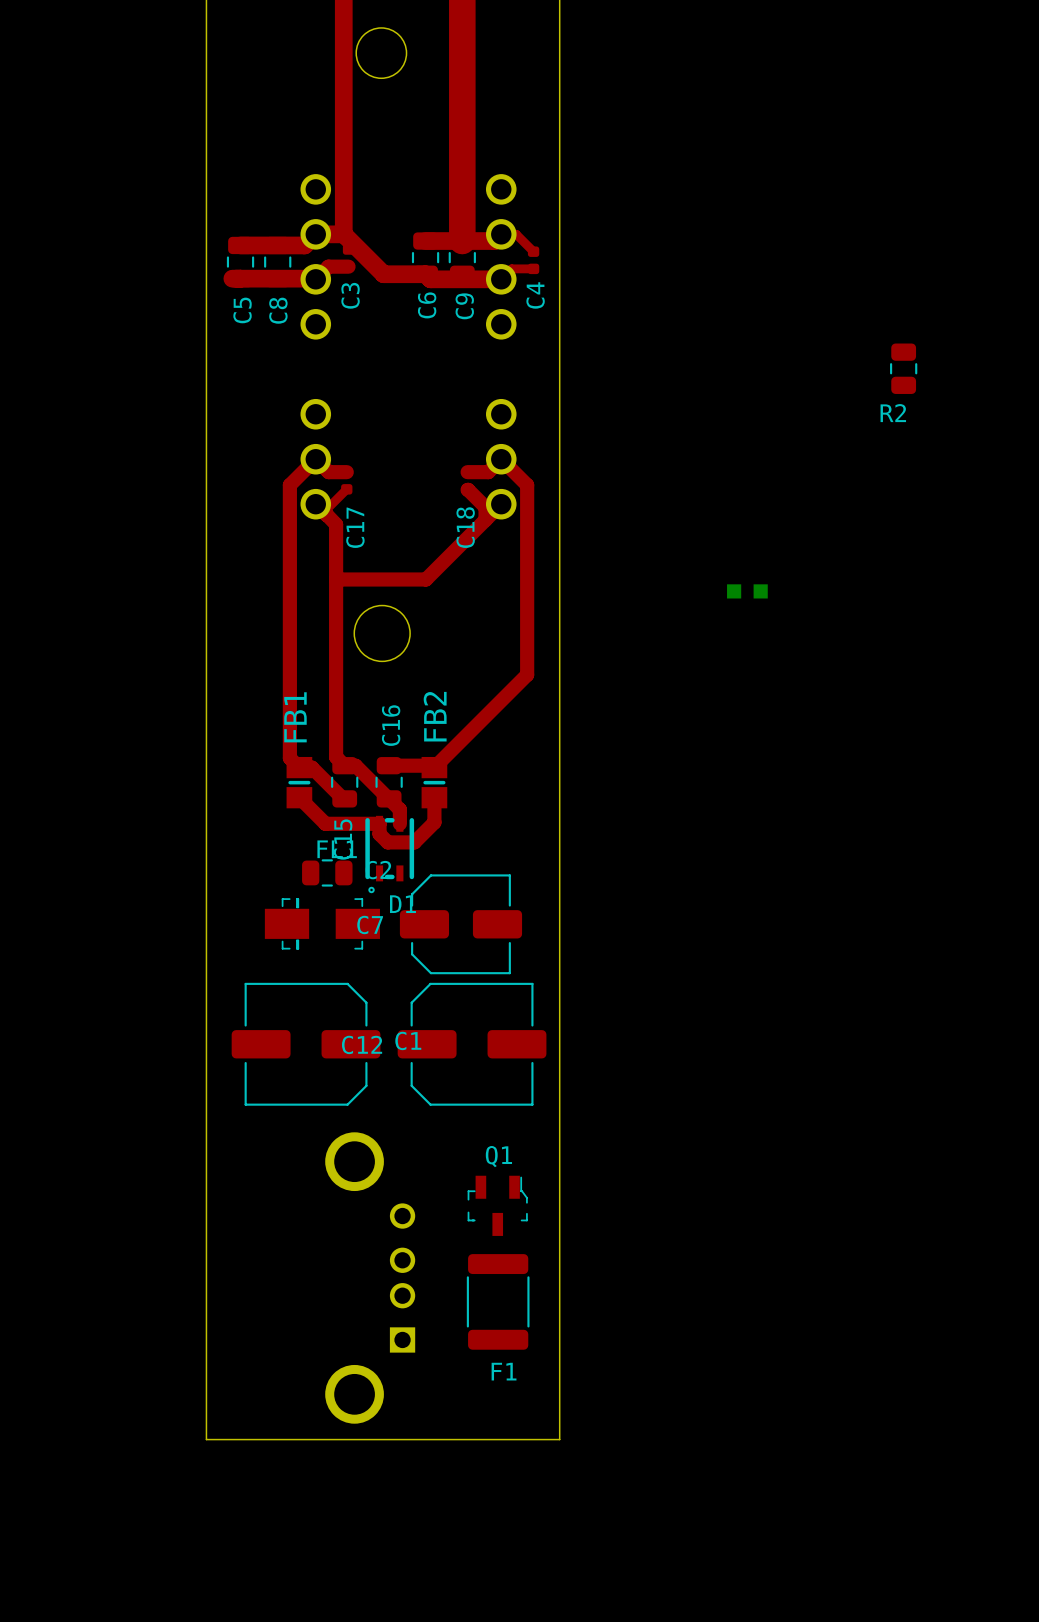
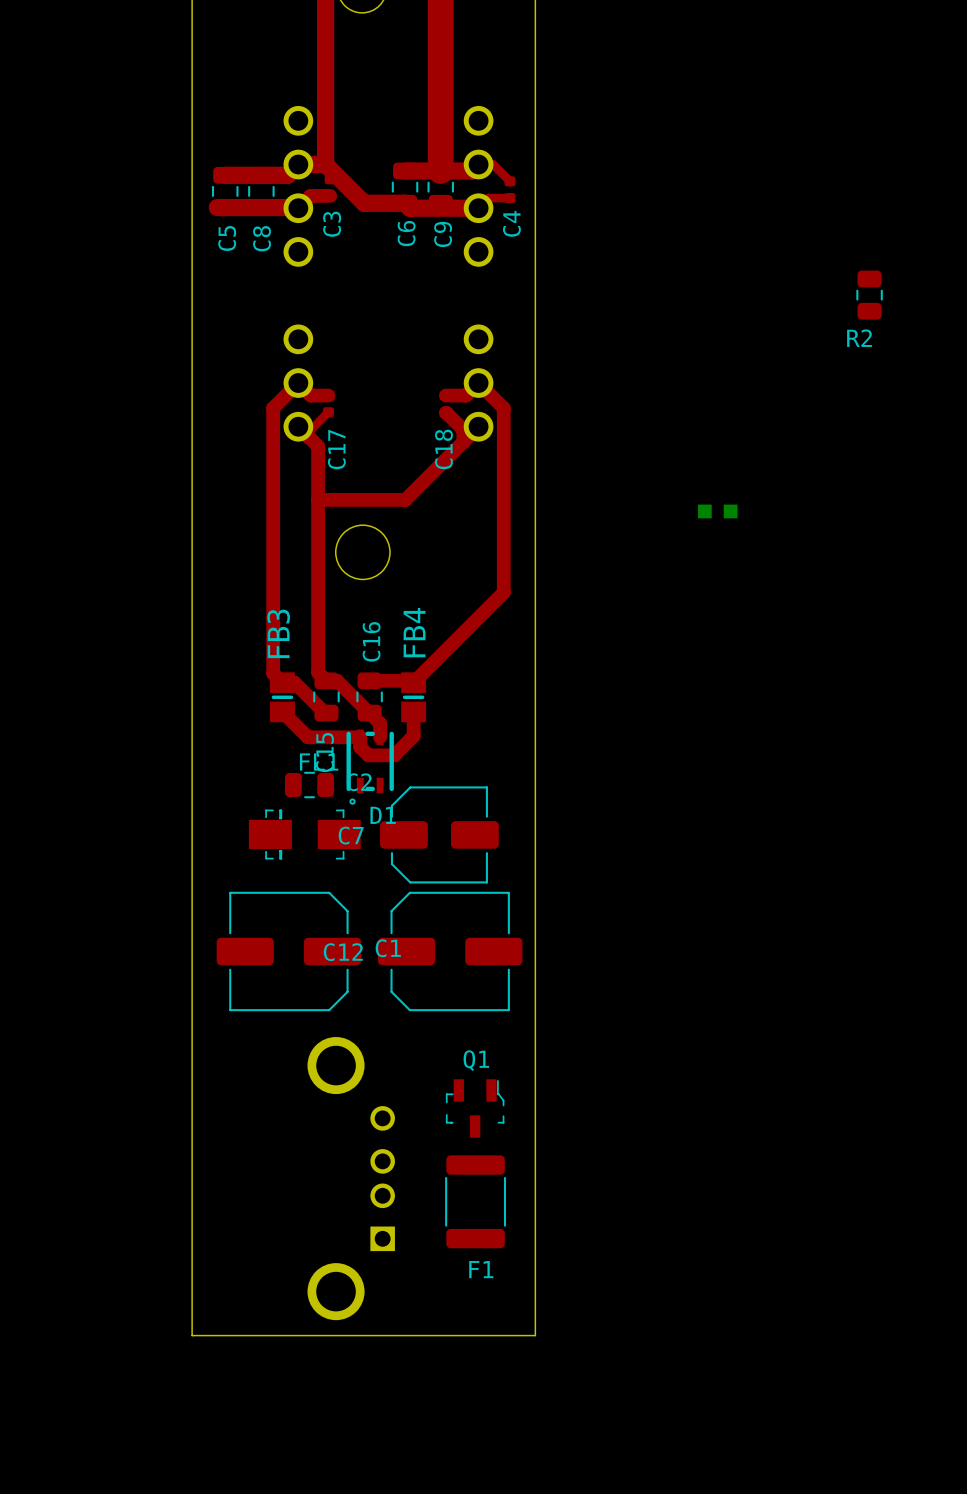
FB2 name: FB2 (435, 716) -> FB4 (414, 632)
FB1 name: FB1 (295, 717) -> FB3 (278, 633)

